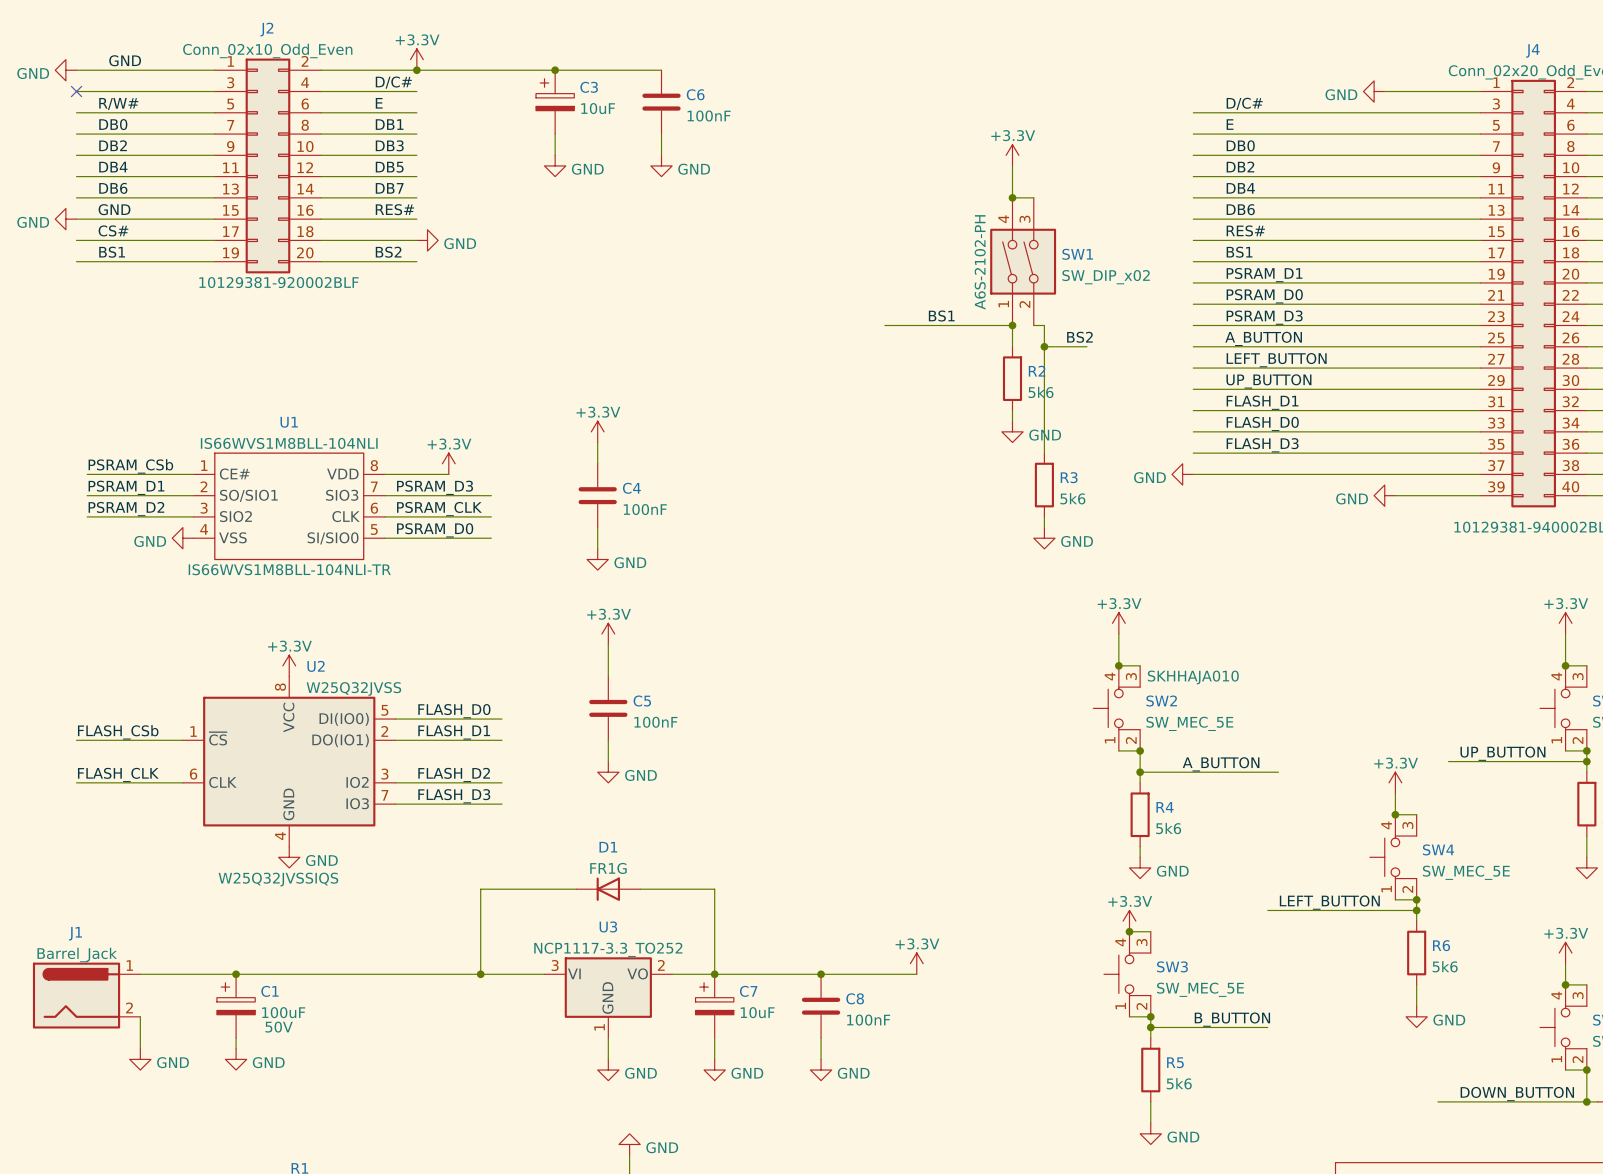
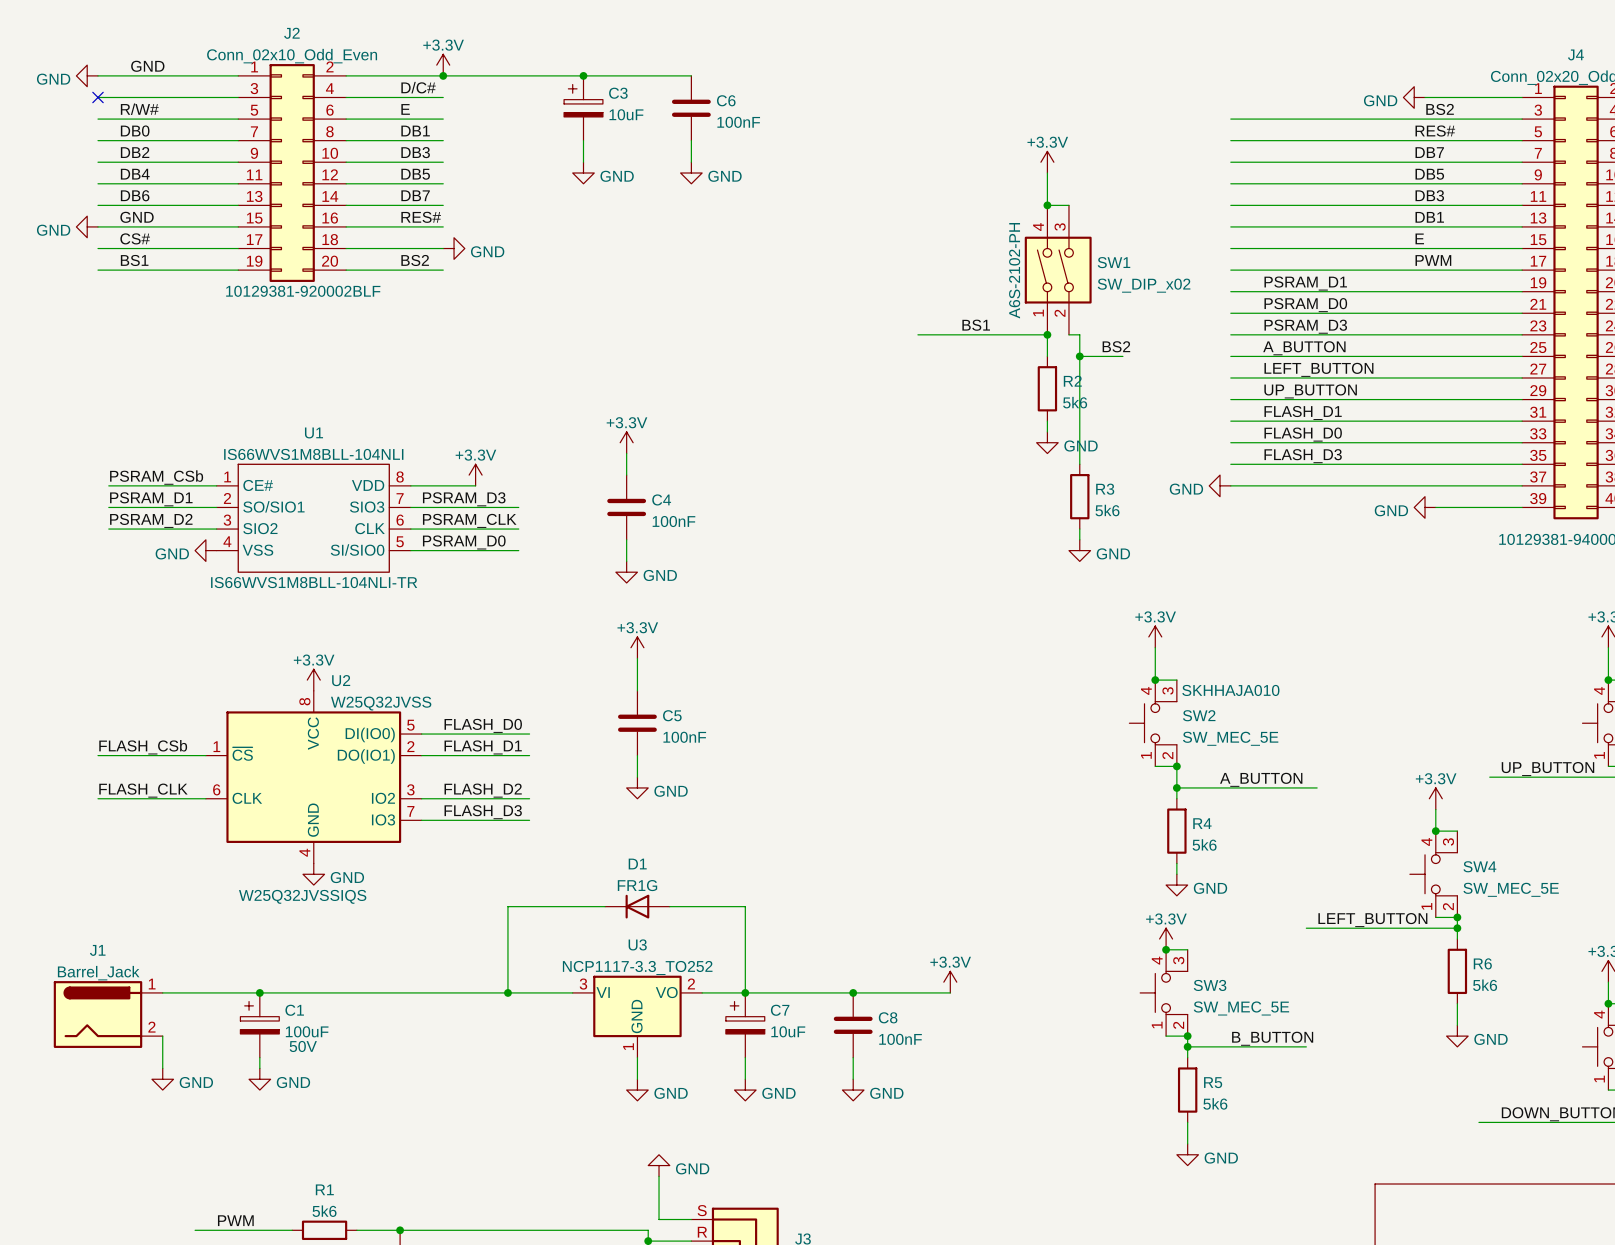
label: D/C# (1244, 103) -> none
label: none -> BS2 (1440, 109)
label position: E (1230, 124) -> E (1419, 238)
label: DB0 (1240, 145) -> none
label: none -> DB7 (1429, 152)
label: DB2 (1240, 167) -> none
label: none -> DB5 (1429, 174)
label: DB4 (1240, 188) -> none
label: none -> DB3 (1429, 195)
label: DB6 (1240, 209) -> none
label: none -> DB1 (1429, 217)
label position: RES# (1245, 230) -> RES# (1435, 131)
label: BS1 (1239, 252) -> none
label: none -> PWM (1433, 260)

